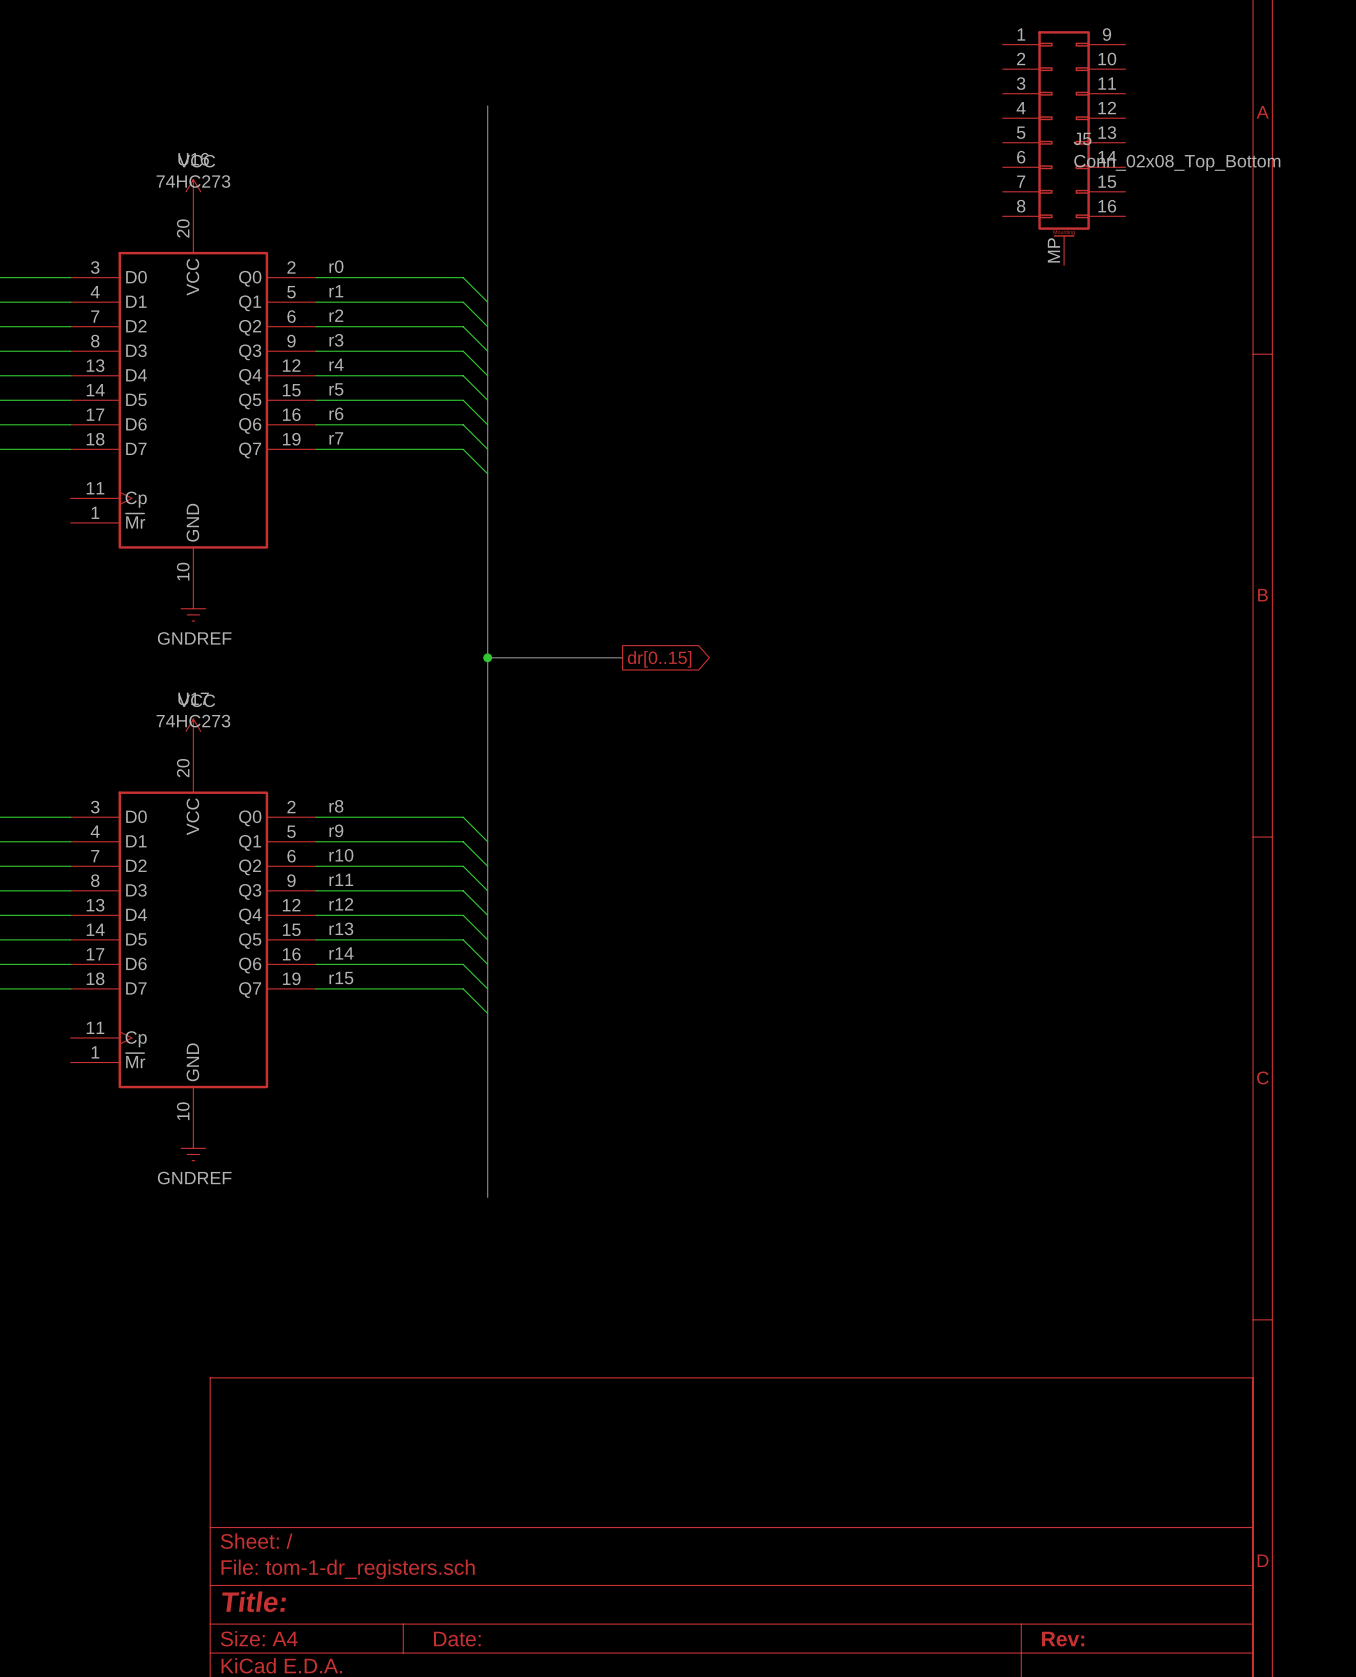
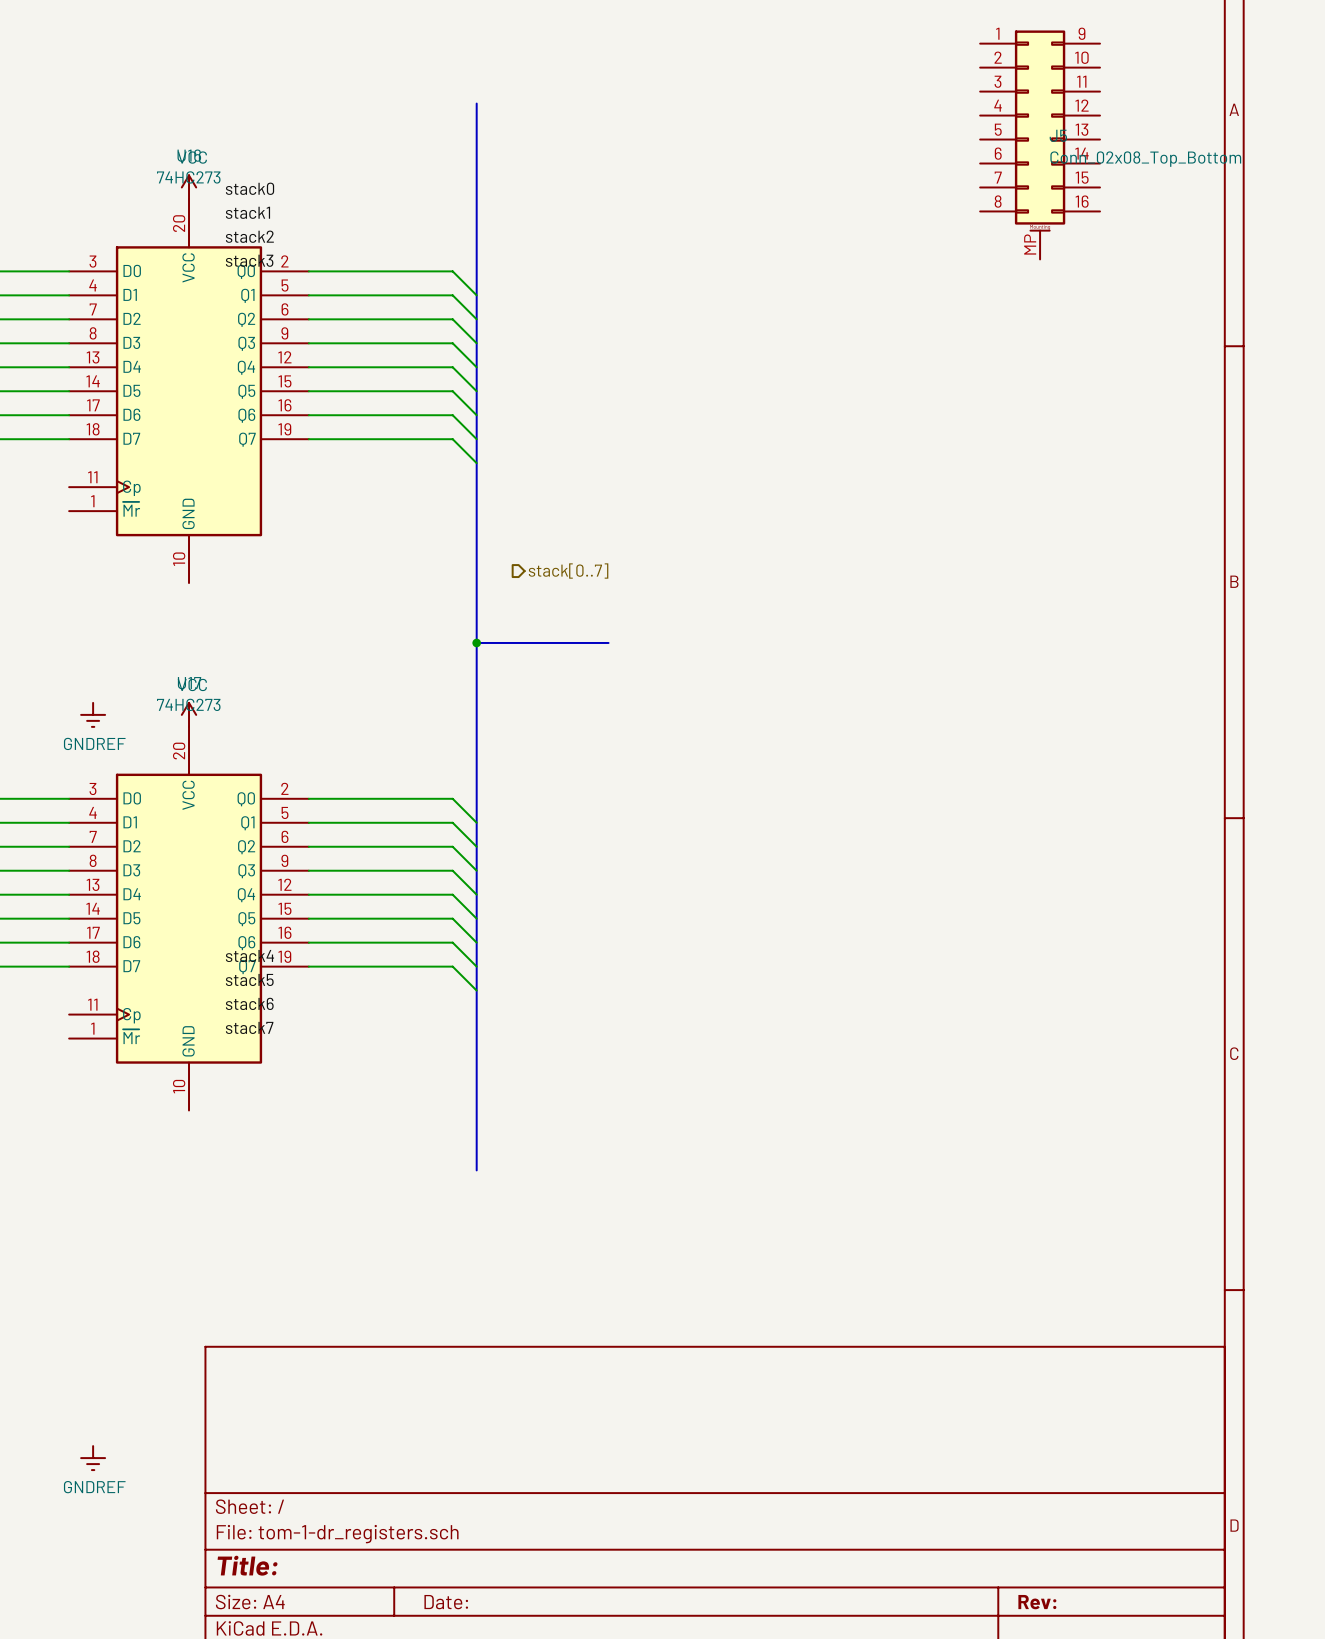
label: none -> stack0 (250, 188)
label: none -> stack1 (247, 212)
label: none -> stack2 (249, 236)
label: none -> stack3 (249, 260)
label: r0 (336, 266) -> none
label: r1 (336, 291) -> none
label: r2 (336, 315) -> none
label: r3 (336, 340) -> none
label: r4 (336, 364) -> none
label: r5 (336, 389) -> none
label: r6 (336, 413) -> none
label: r7 (336, 438) -> none
hierarchical label: none -> stack[0..7] (568, 571)
power symbol position: GNDREF (193, 608) -> GNDREF (93, 714)
global label: dr[0..15] (659, 659) -> none
label: r8 (336, 806) -> none
label: r9 (336, 830) -> none
label: r10 (341, 855) -> none
label: r11 (341, 879) -> none
label: r12 (341, 904) -> none
label: r13 (341, 928) -> none
label: r14 (341, 953) -> none
label: none -> stack4 (249, 956)
label: r15 (341, 978) -> none
label: none -> stack5 (249, 979)
label: none -> stack6 (249, 1003)
label: none -> stack7 (249, 1027)
power symbol: GNDREF (193, 1148) -> none
power symbol: none -> GNDREF (93, 1458)

